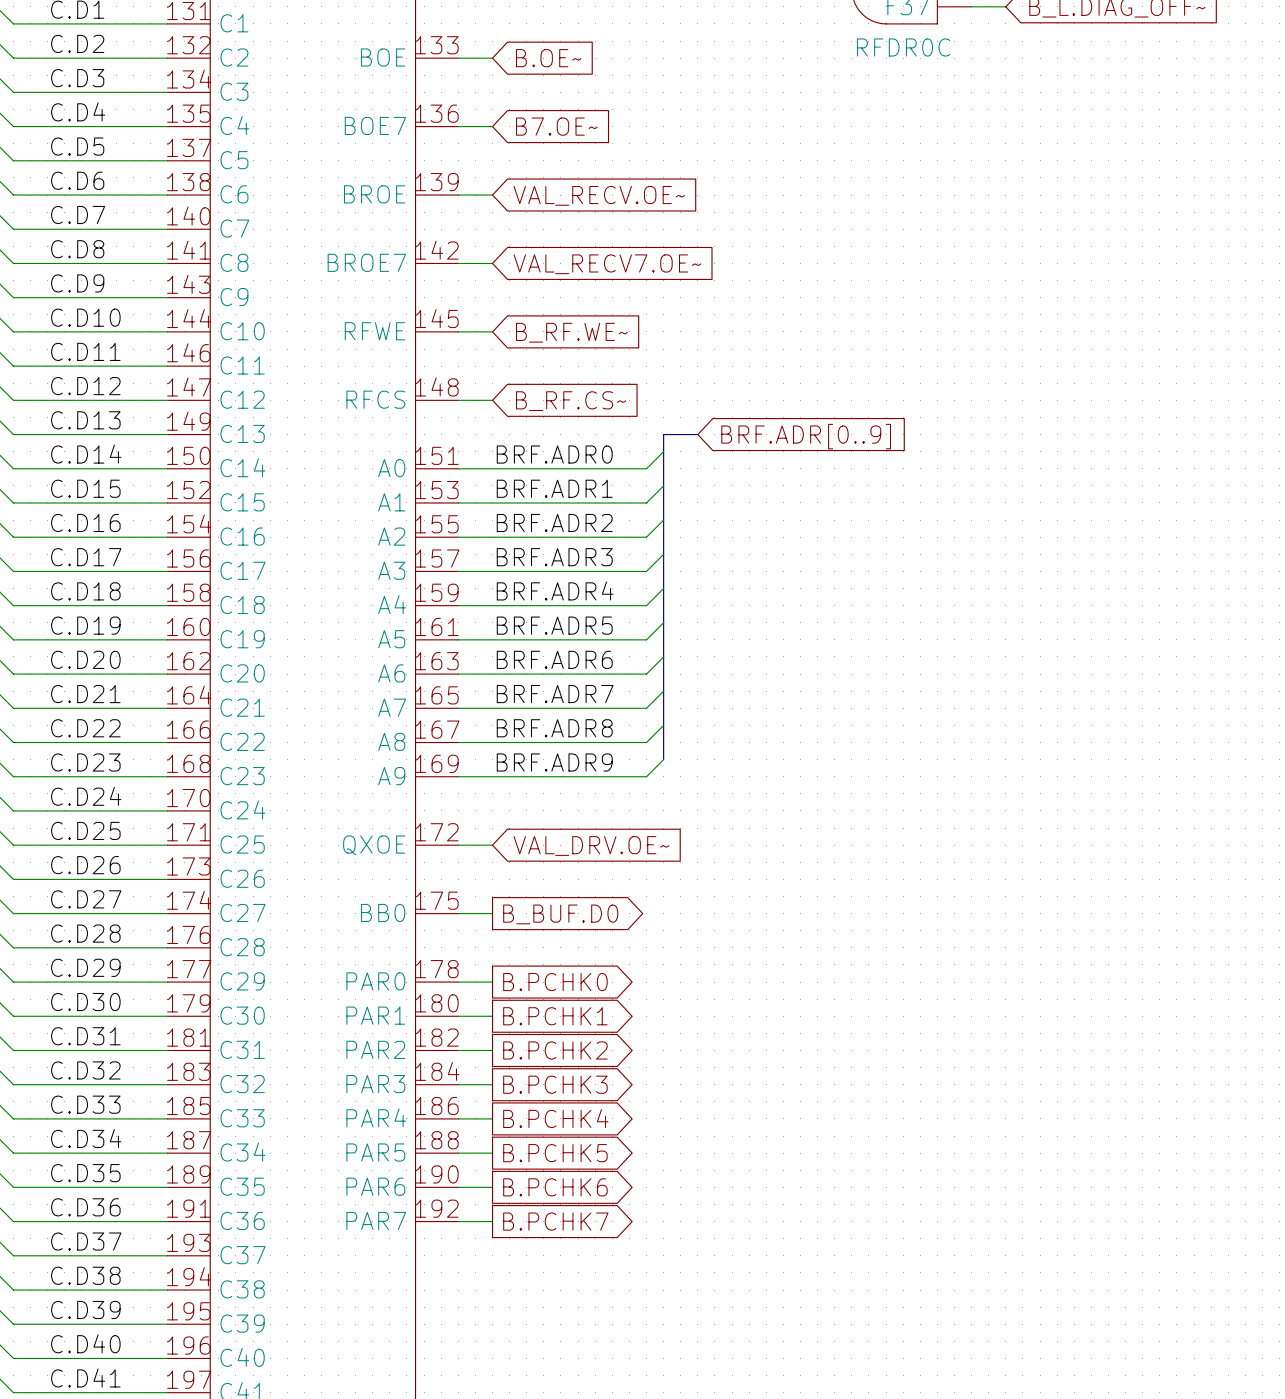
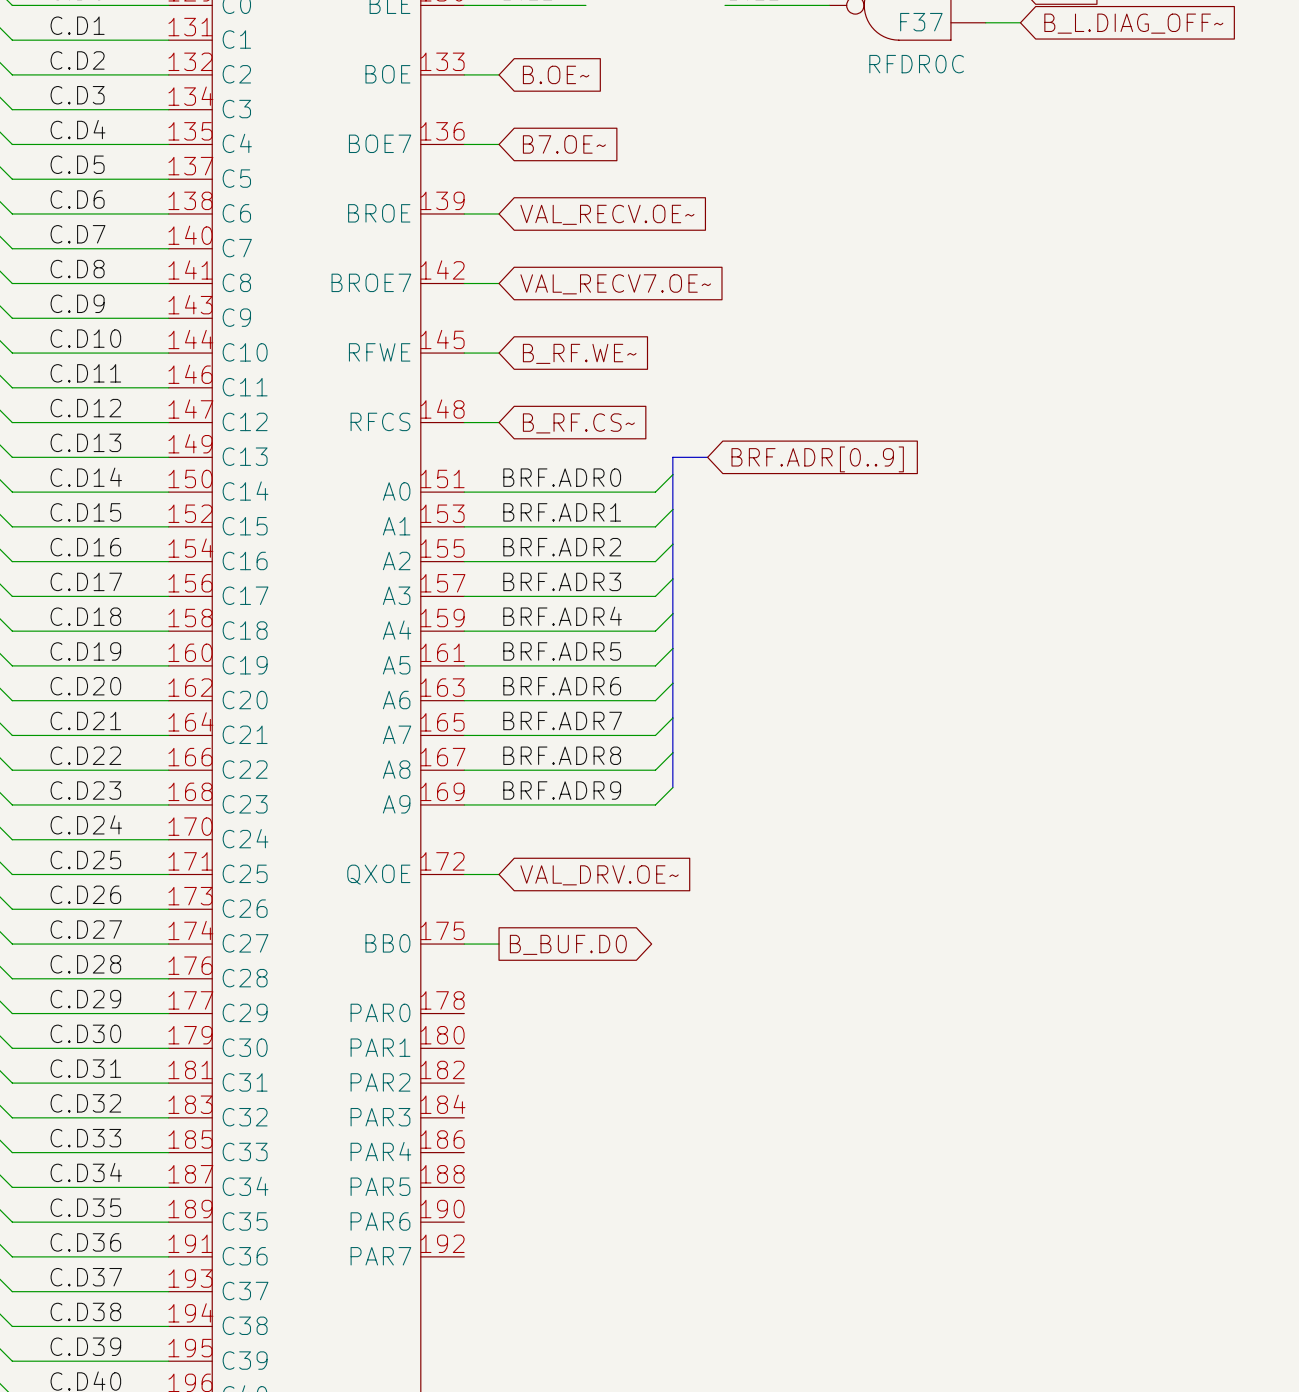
wire: (458, 982) (492, 982) -> none
global label: B.PCHK0 (555, 982) -> none
wire: (458, 1016) (492, 1016) -> none
global label: B.PCHK1 (555, 1016) -> none
wire: (458, 1050) (492, 1050) -> none
global label: B.PCHK2 (555, 1050) -> none
wire: (458, 1084) (492, 1084) -> none
global label: B.PCHK3 (555, 1084) -> none
wire: (458, 1118) (492, 1118) -> none
global label: B.PCHK4 (555, 1118) -> none
wire: (458, 1153) (492, 1153) -> none
global label: B.PCHK5 (555, 1153) -> none
wire: (458, 1187) (492, 1187) -> none
global label: B.PCHK6 (555, 1187) -> none
wire: (458, 1221) (492, 1221) -> none
global label: B.PCHK7 (555, 1221) -> none

